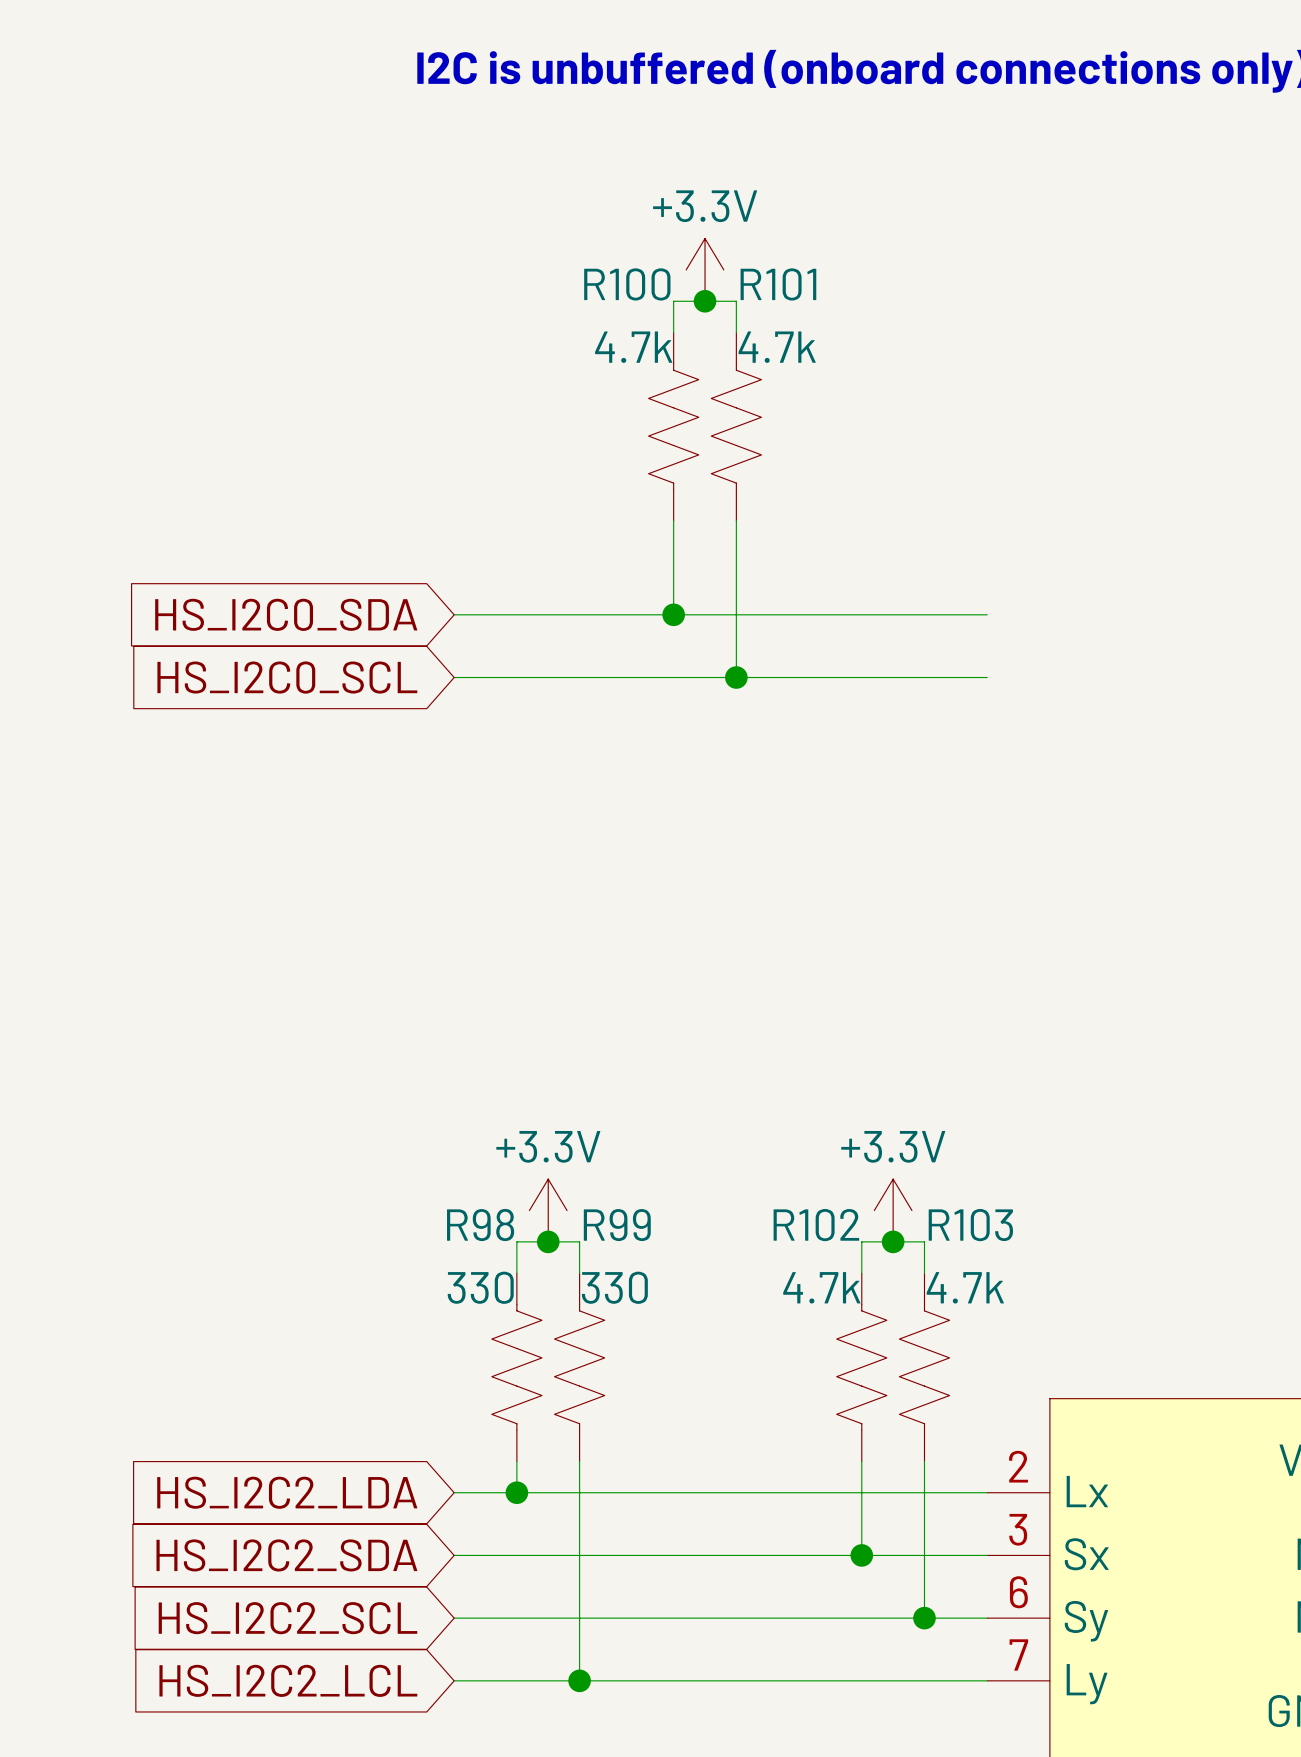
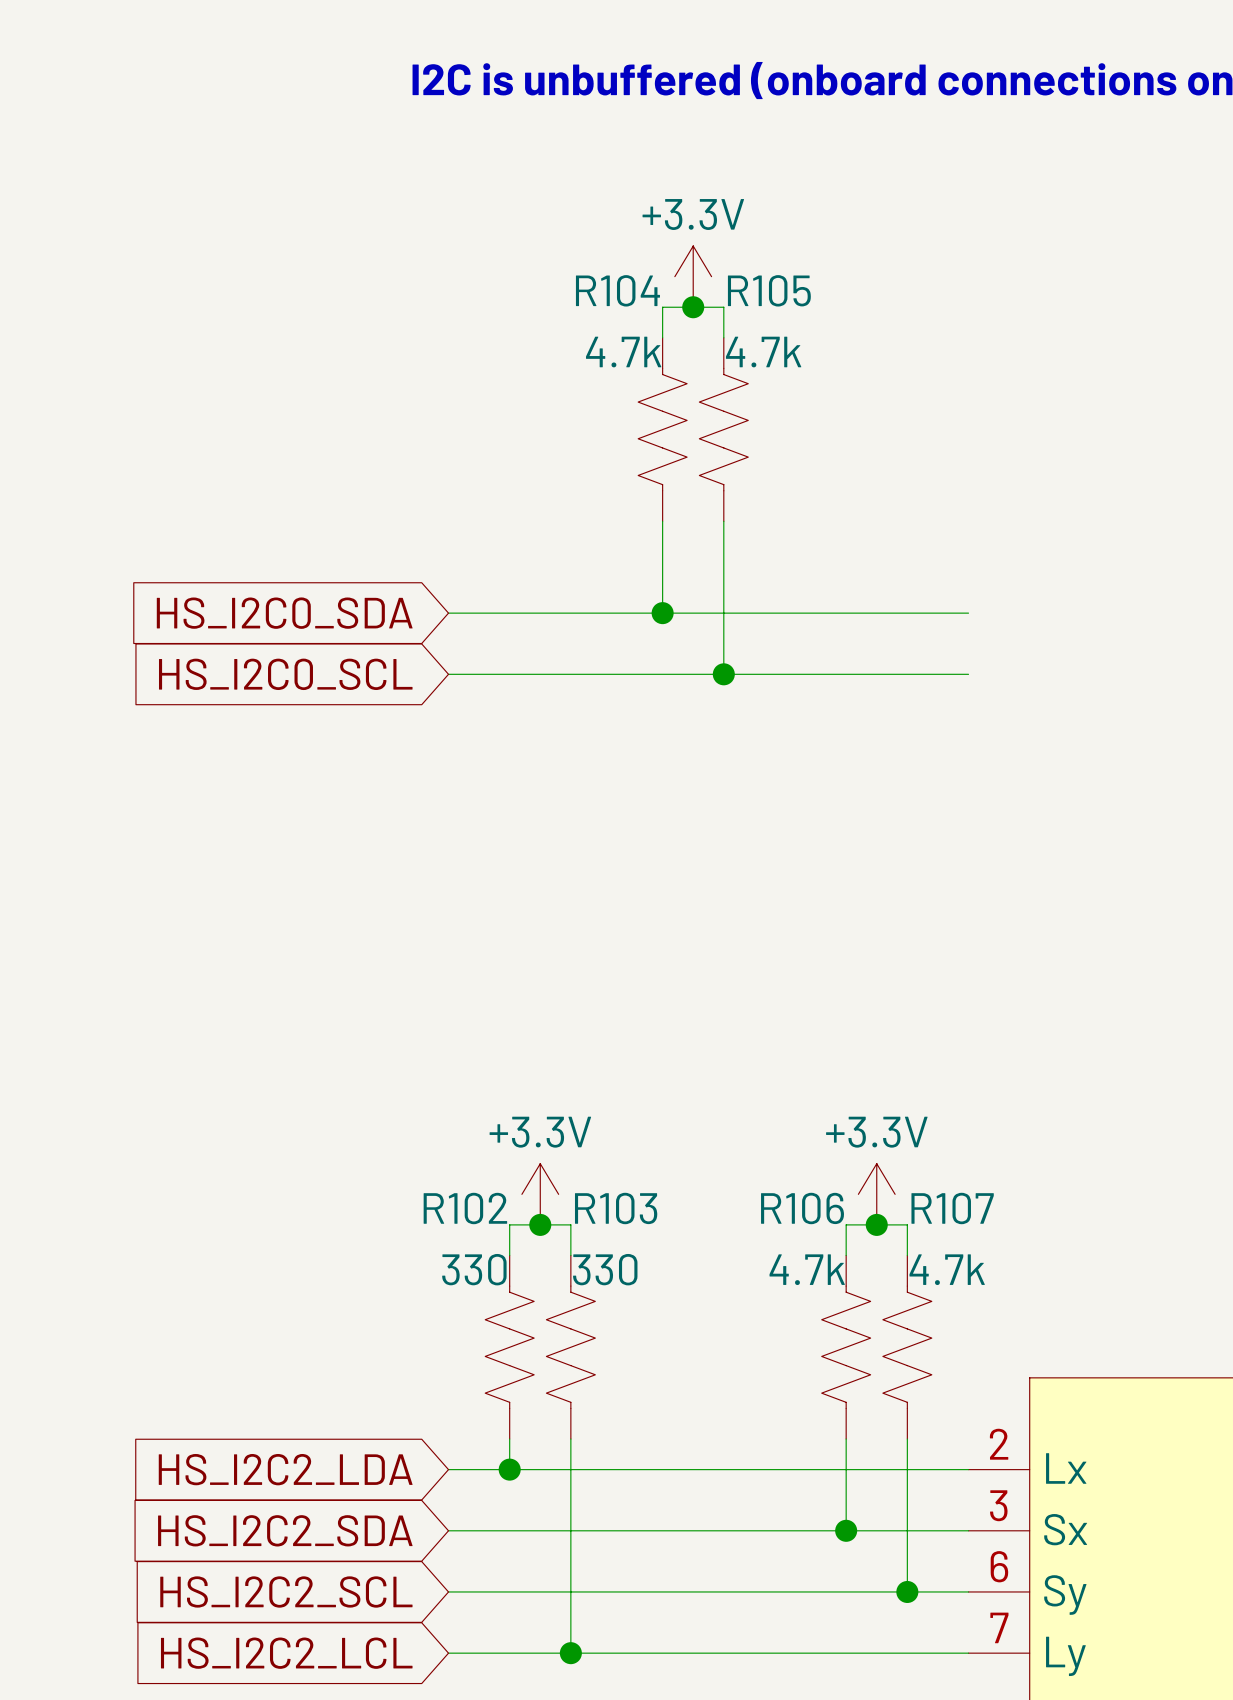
R100 name: R100 (627, 284) -> R104 (617, 290)
R101 name: R101 (778, 284) -> R105 (769, 290)
R98 name: R98 (480, 1224) -> R102 (465, 1208)
R99 name: R99 (617, 1225) -> R103 (616, 1208)
R102 name: R102 (816, 1225) -> R106 (802, 1208)
R103 name: R103 (970, 1225) -> R107 (952, 1208)

